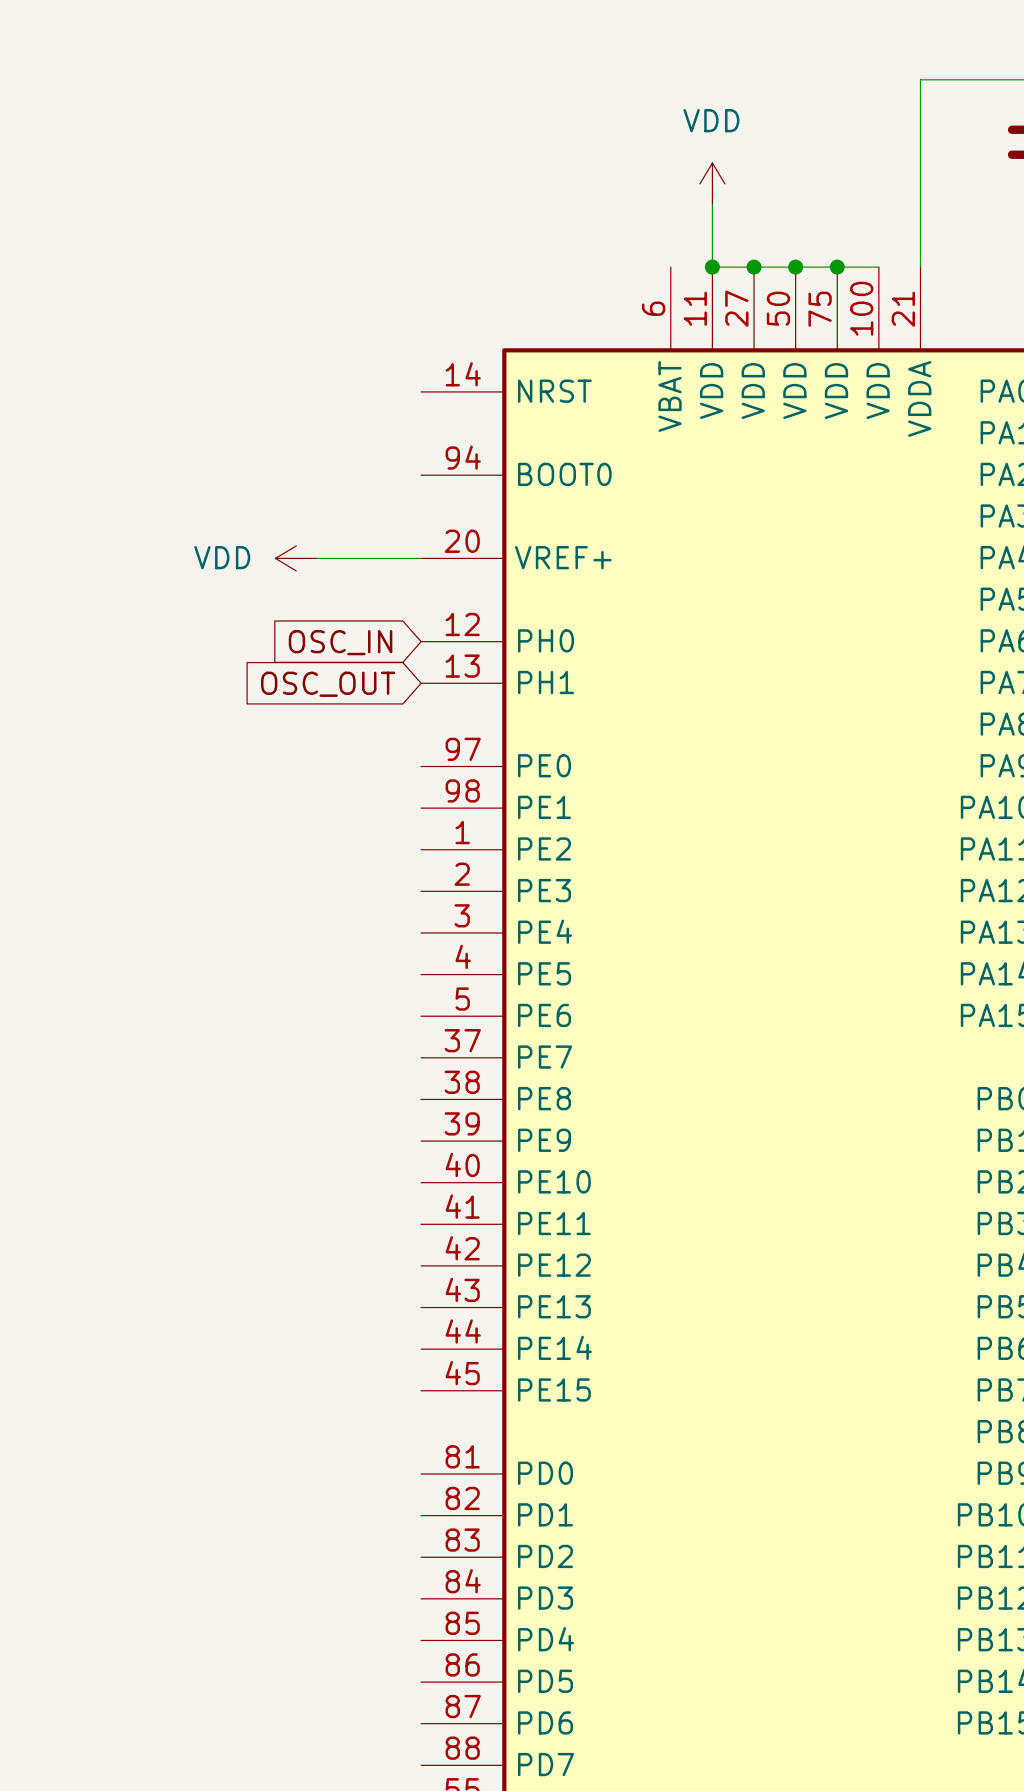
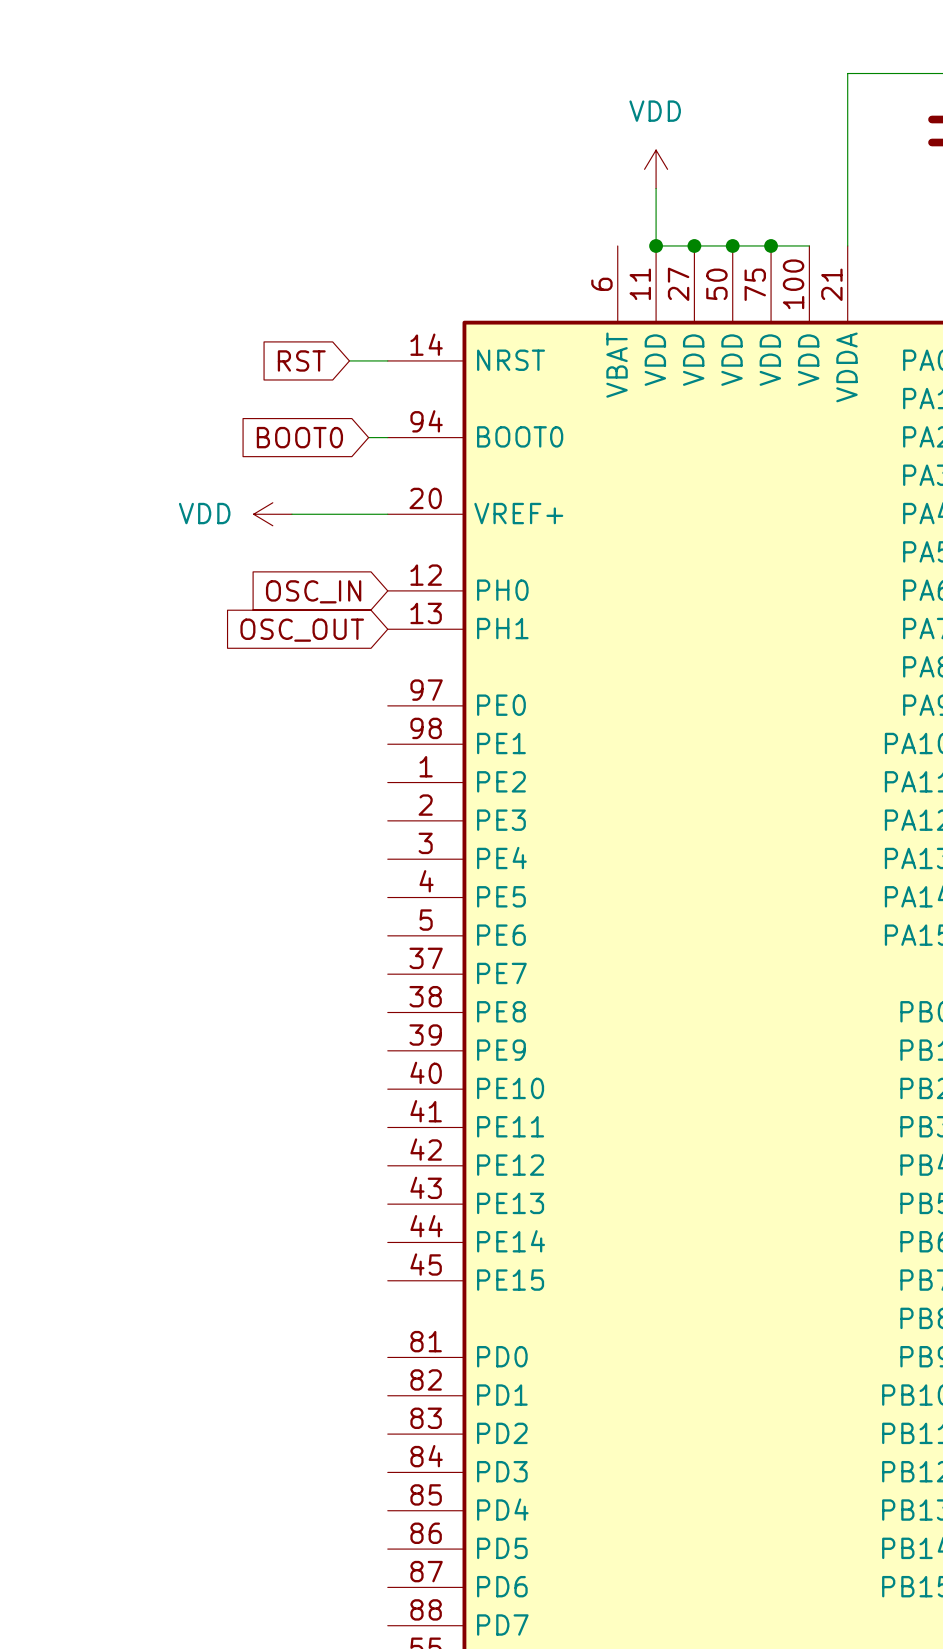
global label: none -> RST (301, 360)
wire: none -> (349, 360) (387, 360)
global label: none -> BOOT0 (299, 437)
wire: none -> (368, 437) (387, 437)

